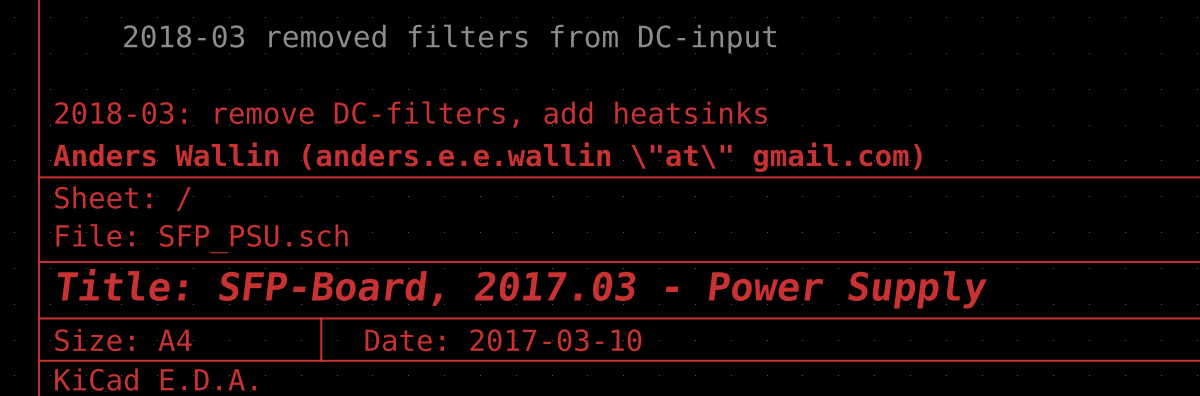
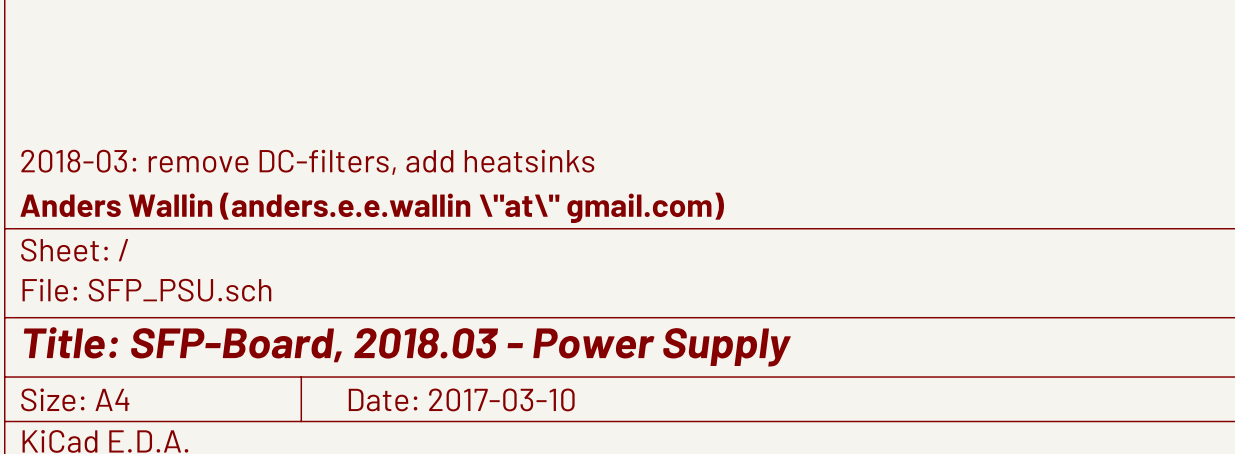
text: 2018-03 removed filters from DC-input (450, 39) -> none
title block: Title: SFP-Board, 2017.03 - Power Supply (522, 288) -> Title: SFP-Board, 2018.03 - Power Supply (407, 346)

